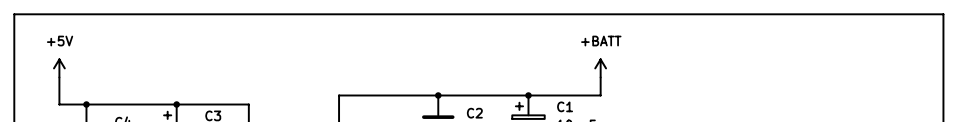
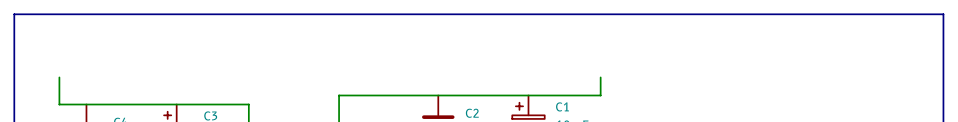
power symbol: +5V (59, 68) -> none
power symbol: +BATT (600, 68) -> none
junction: (438, 95) -> none
junction: (528, 95) -> none
junction: (86, 104) -> none
junction: (176, 104) -> none

